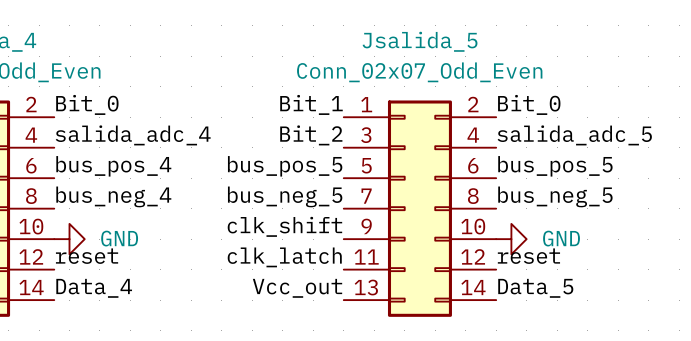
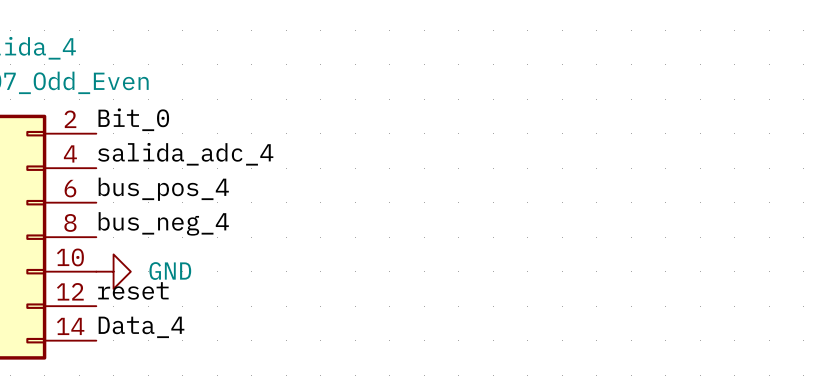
label: Bit_1 (311, 104) -> none
label: Bit_0 (529, 104) -> none
label: Bit_2 (311, 135) -> none
label: salida_adc_5 (574, 135) -> none
label: bus_pos_5 (285, 166) -> none
label: bus_pos_5 (555, 166) -> none
label: bus_neg_5 (285, 196) -> none
label: bus_neg_5 (555, 196) -> none
Jsalida_5: Conn_02x07_Odd_Even (419, 208) -> none
label: clk_shift (284, 226) -> none
power symbol: GND (511, 239) -> none
label: reset (528, 256) -> none
label: clk_latch (284, 257) -> none
label: Vcc_out (297, 288) -> none
label: Data_5 (535, 288) -> none

